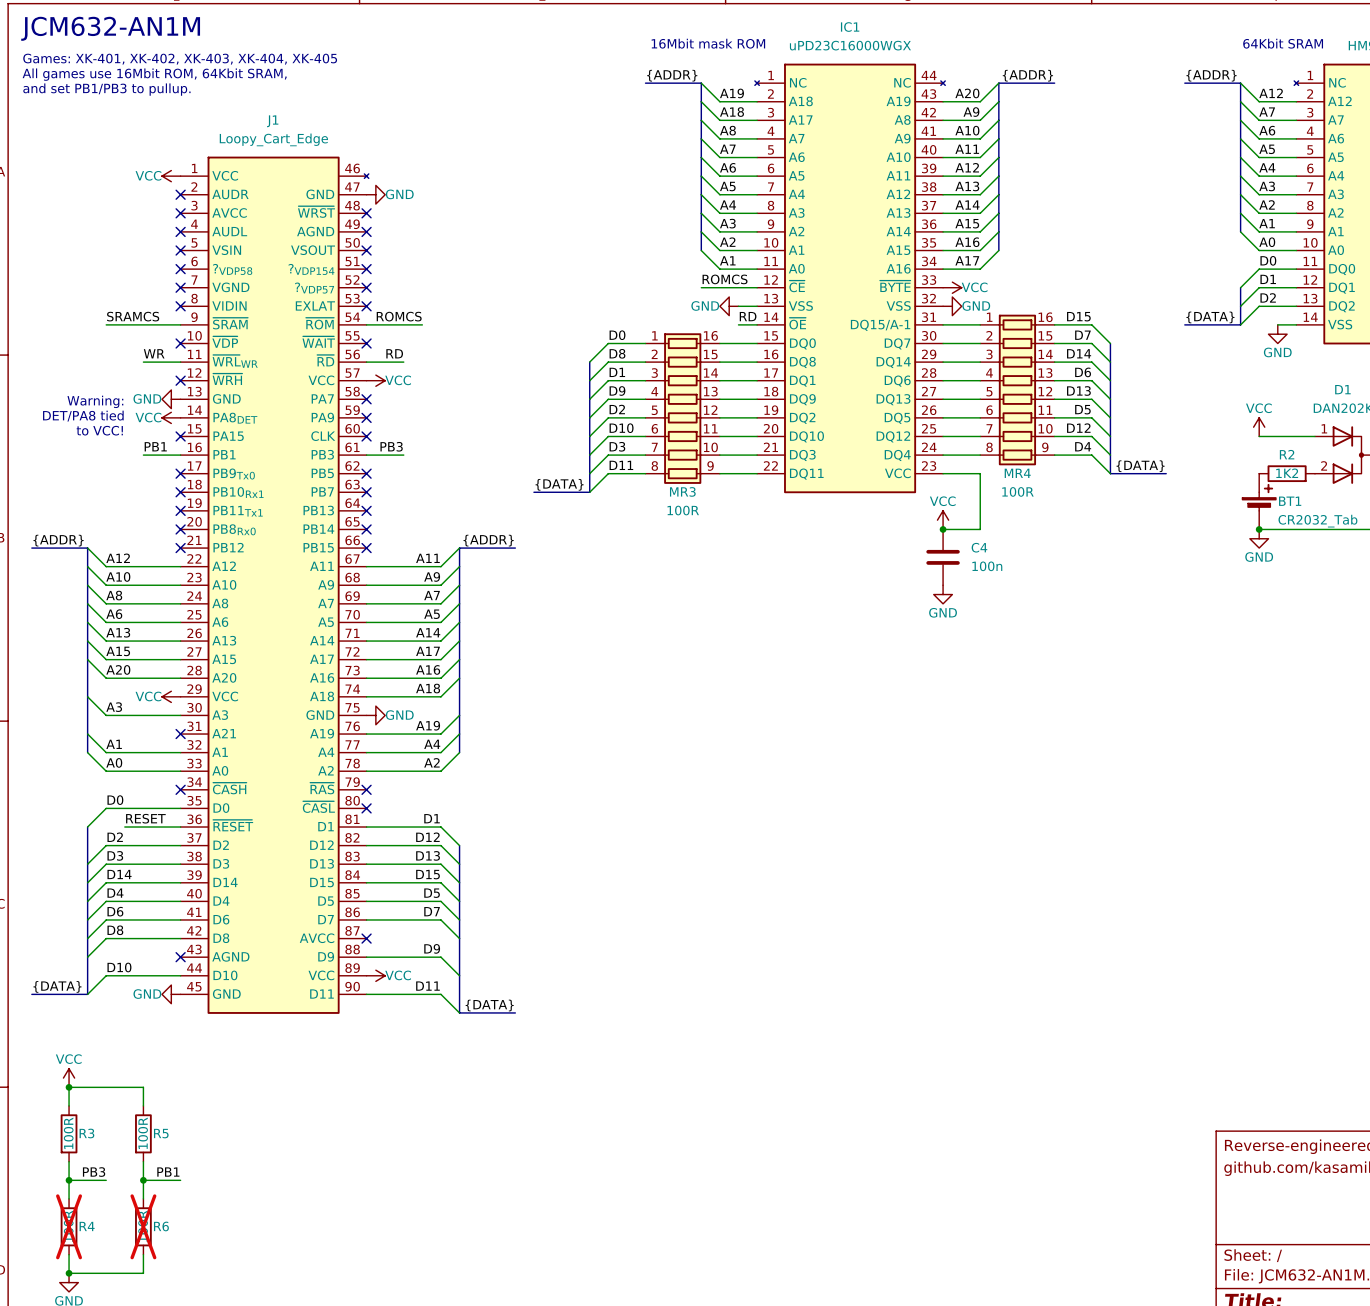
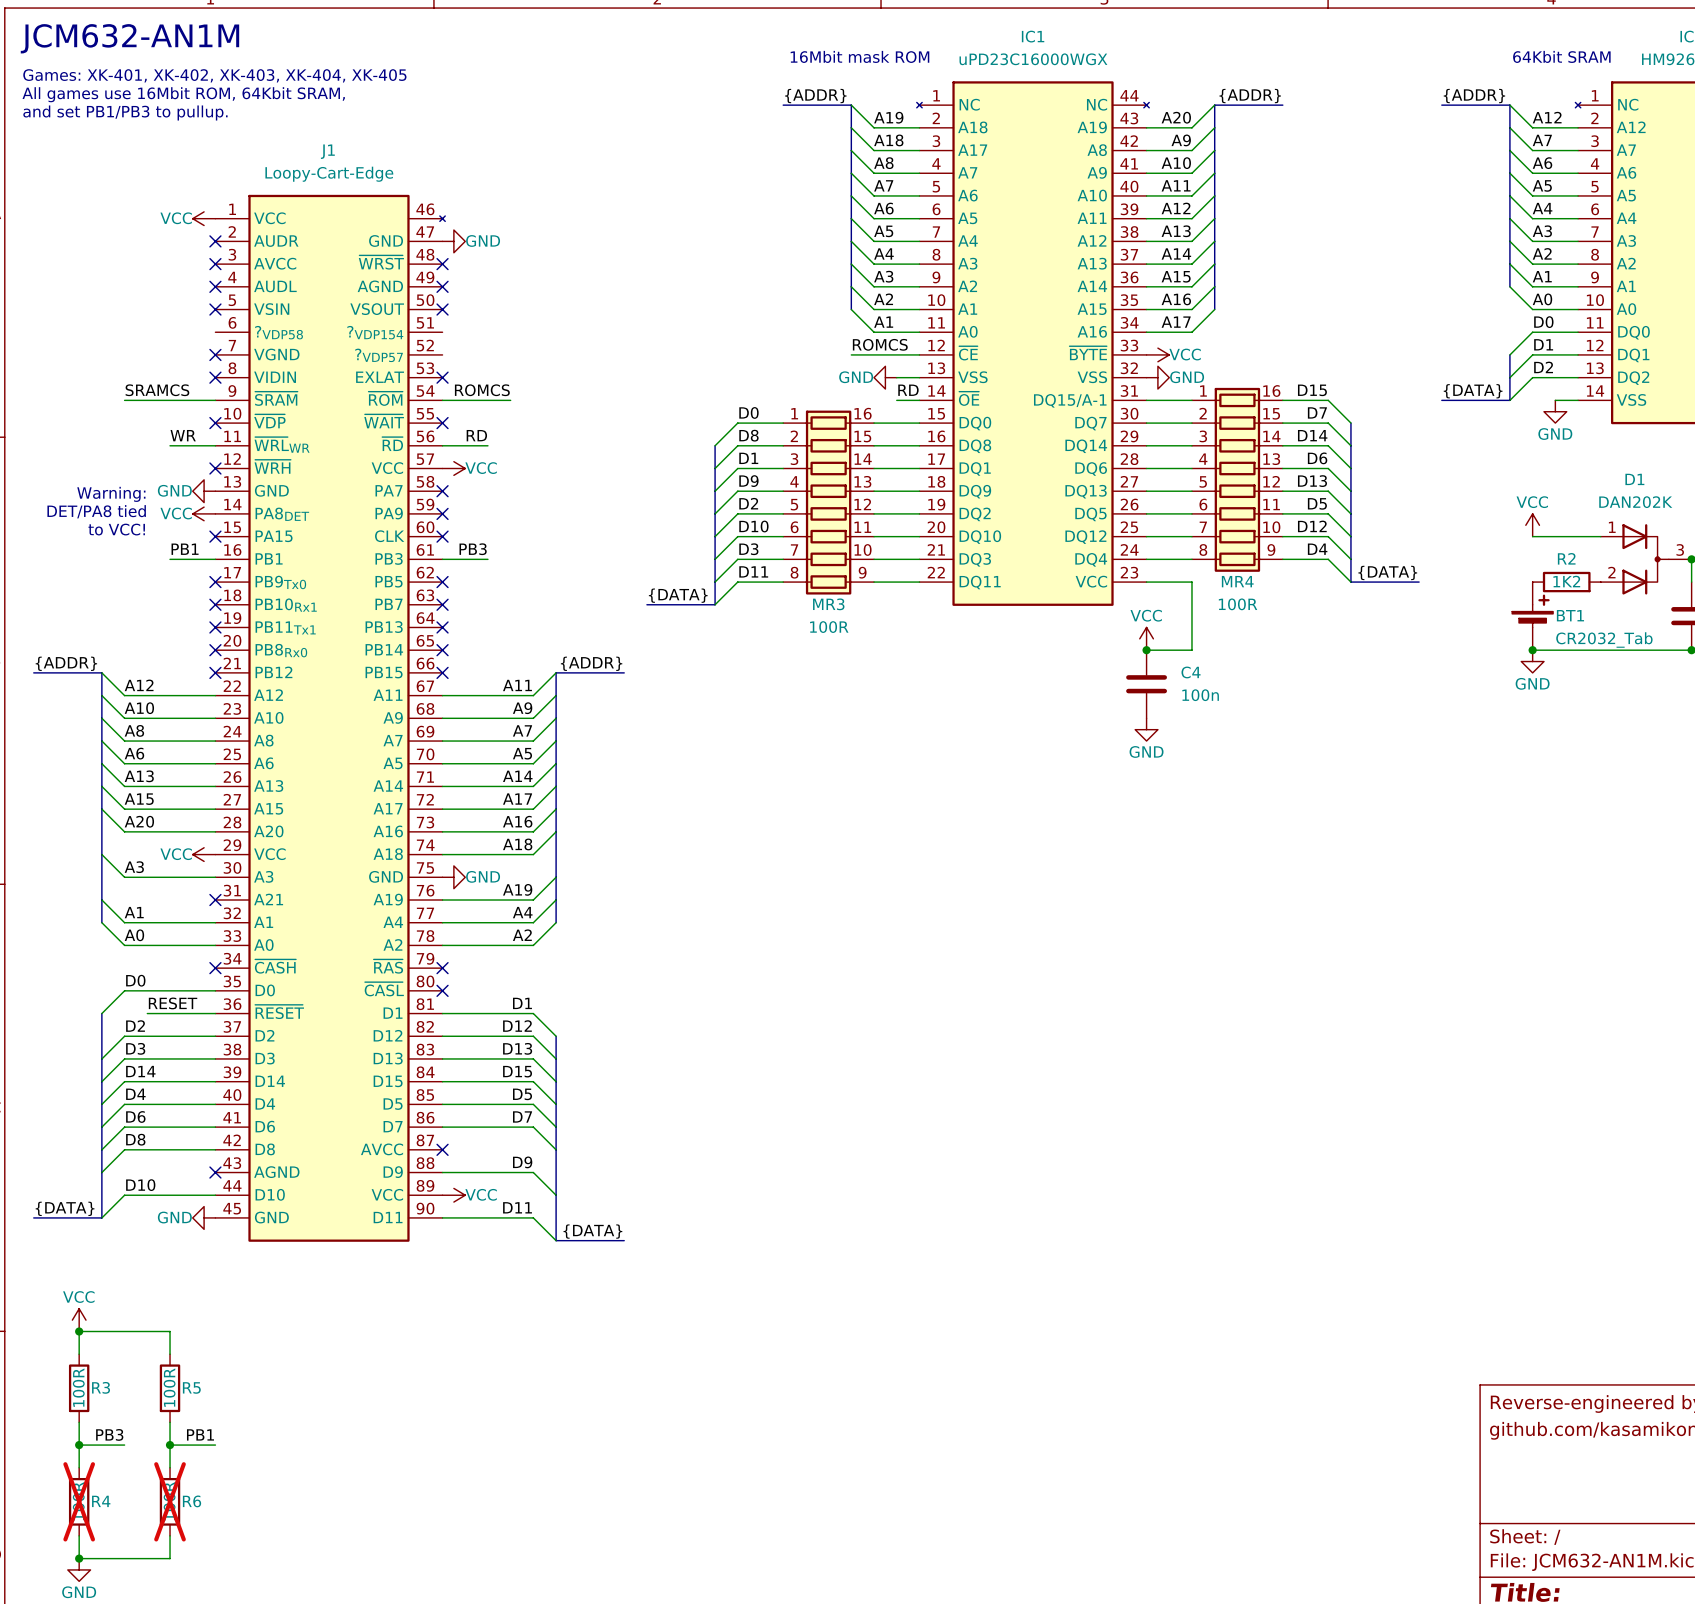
J1 value: Loopy_Cart_Edge (273, 139) -> Loopy-Cart-Edge (329, 174)
no-connect mark: (180, 269) -> none
no-connect mark: (366, 269) -> none
no-connect mark: (366, 287) -> none

